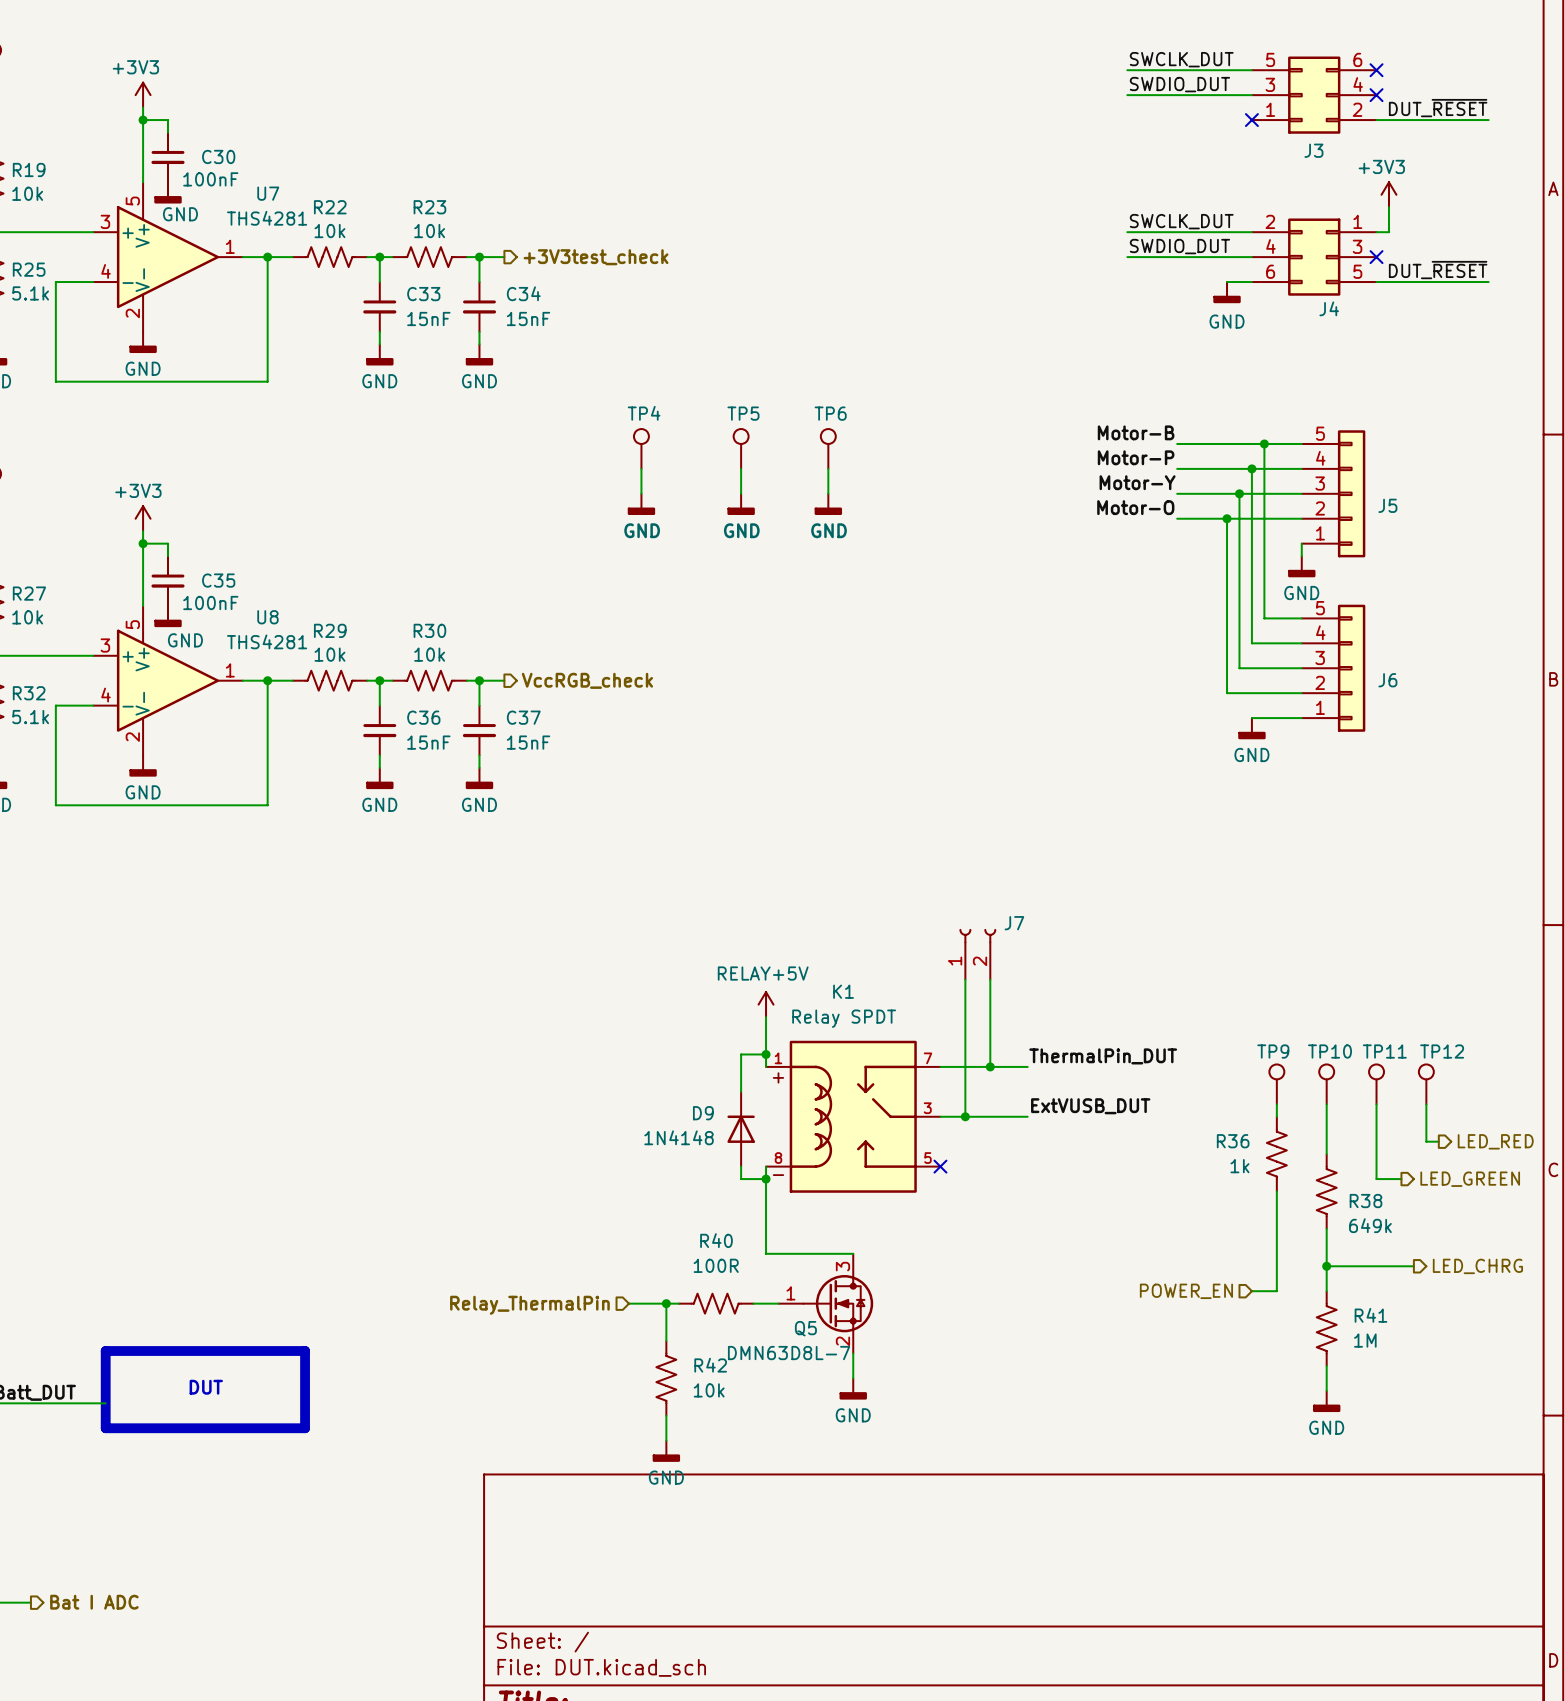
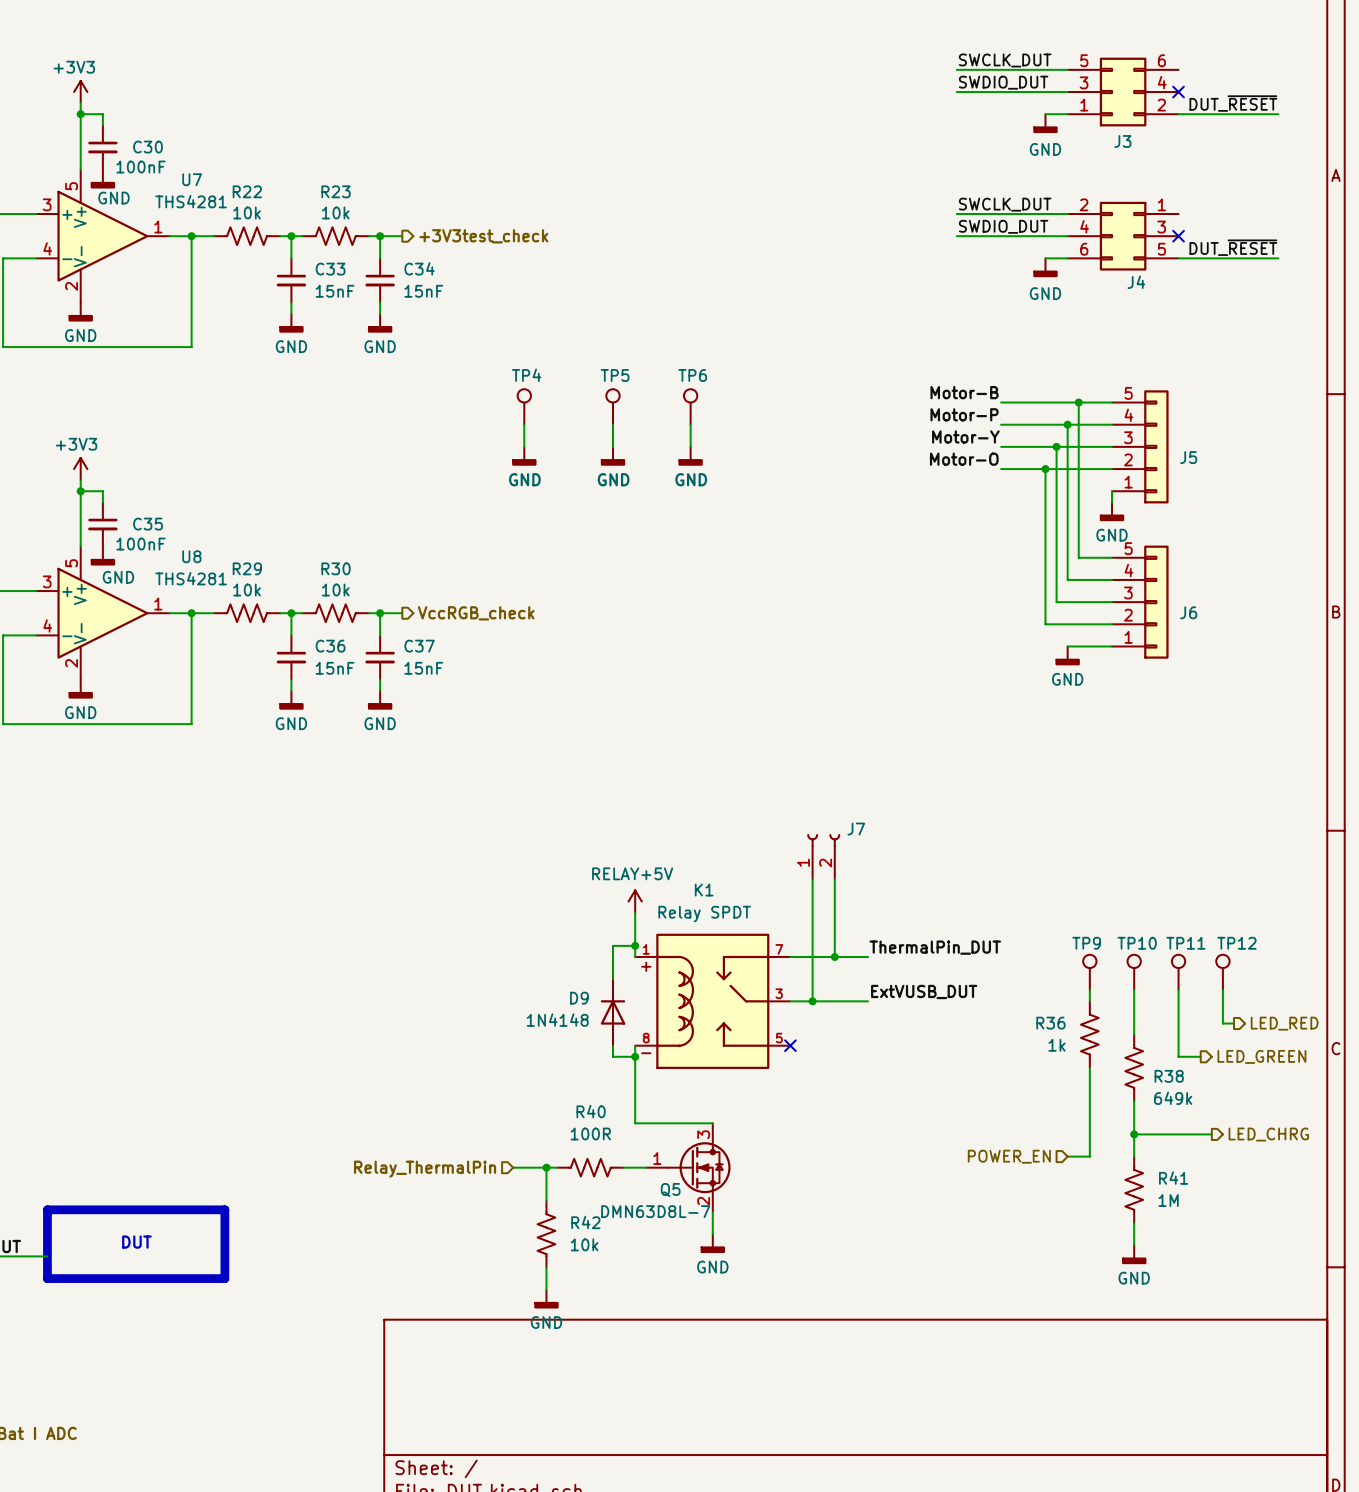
no-connect mark: (1376, 70) -> none
wire: none -> (1045, 114) (1067, 114)
no-connect mark: (1251, 120) -> none
power symbol: none -> GND (1045, 123)
power symbol: +3V3 (1388, 194) -> none
wire: (1388, 207) (1388, 232) (1376, 232) -> none

